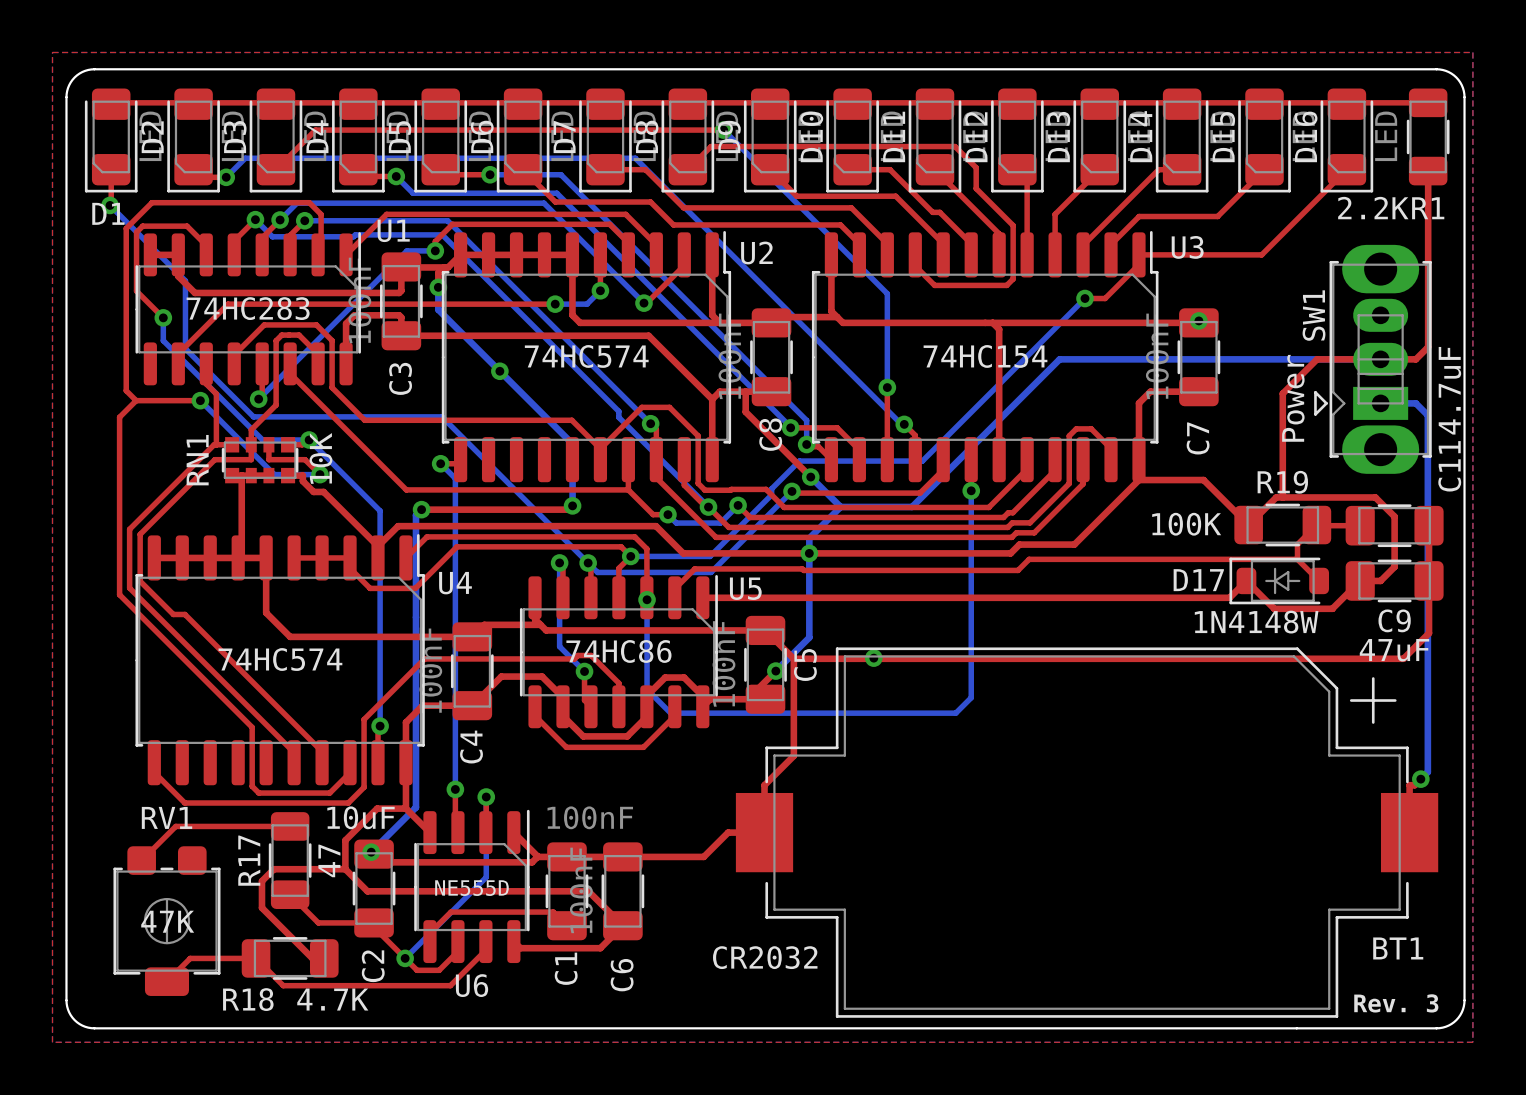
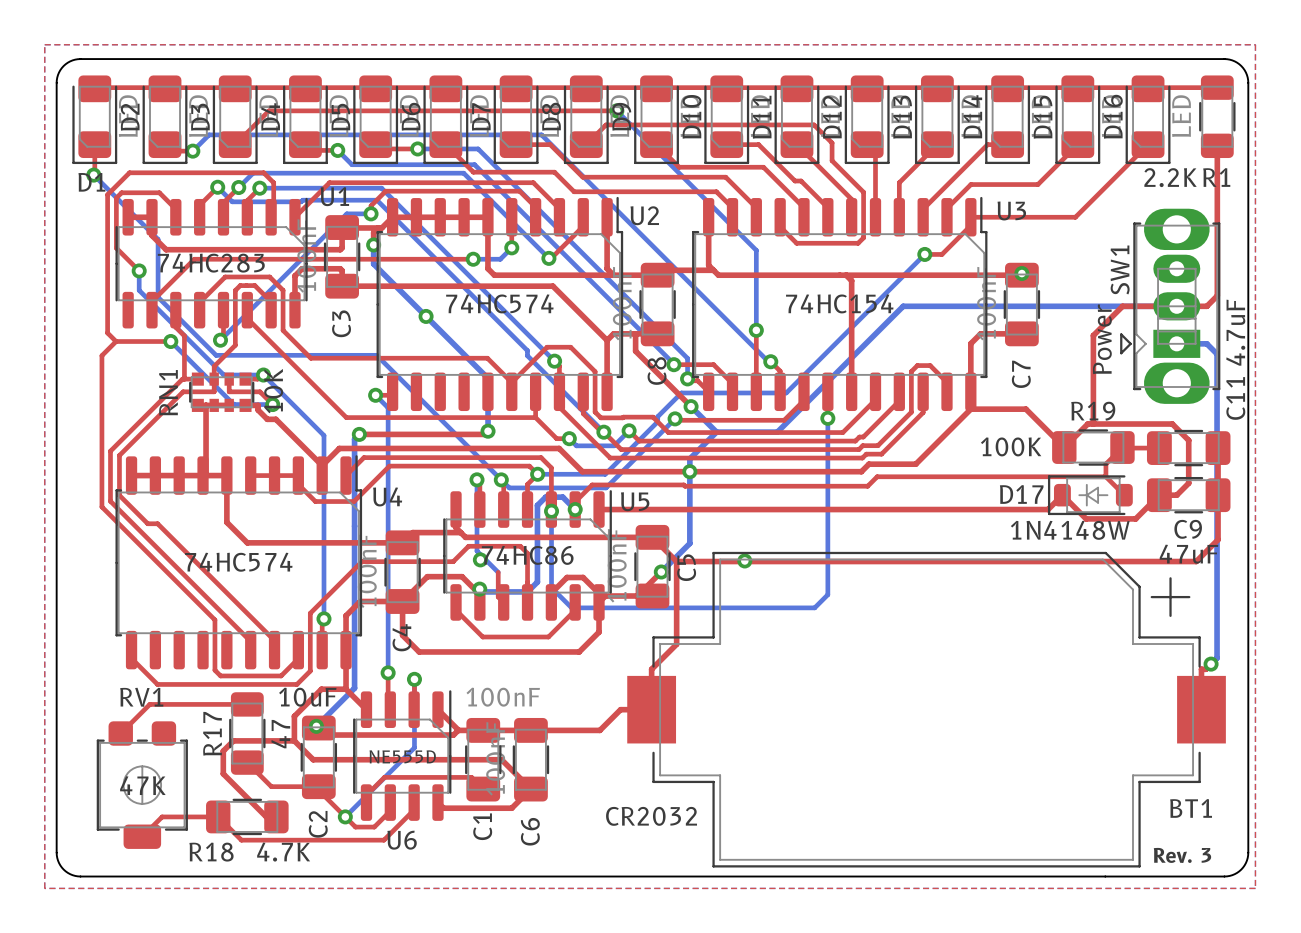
bottom track: none -> (575, 509) (562, 497) (545, 497) (537, 505) (537, 582) (527, 591) (482, 591) (479, 589)
via: none -> (575, 509)
via: none -> (480, 559)
top track: (531, 658) (574, 658) (577, 655) (591, 655) (618, 683) -> (453, 561) (468, 546) (520, 546) (527, 553) (527, 582)
via: (584, 671) -> none
via: none -> (479, 589)
top track: none -> (402, 601) (402, 635) (419, 651) (579, 651) (599, 632) (599, 602)
top track: (562, 716) (583, 736) (627, 736) (646, 716) -> none

